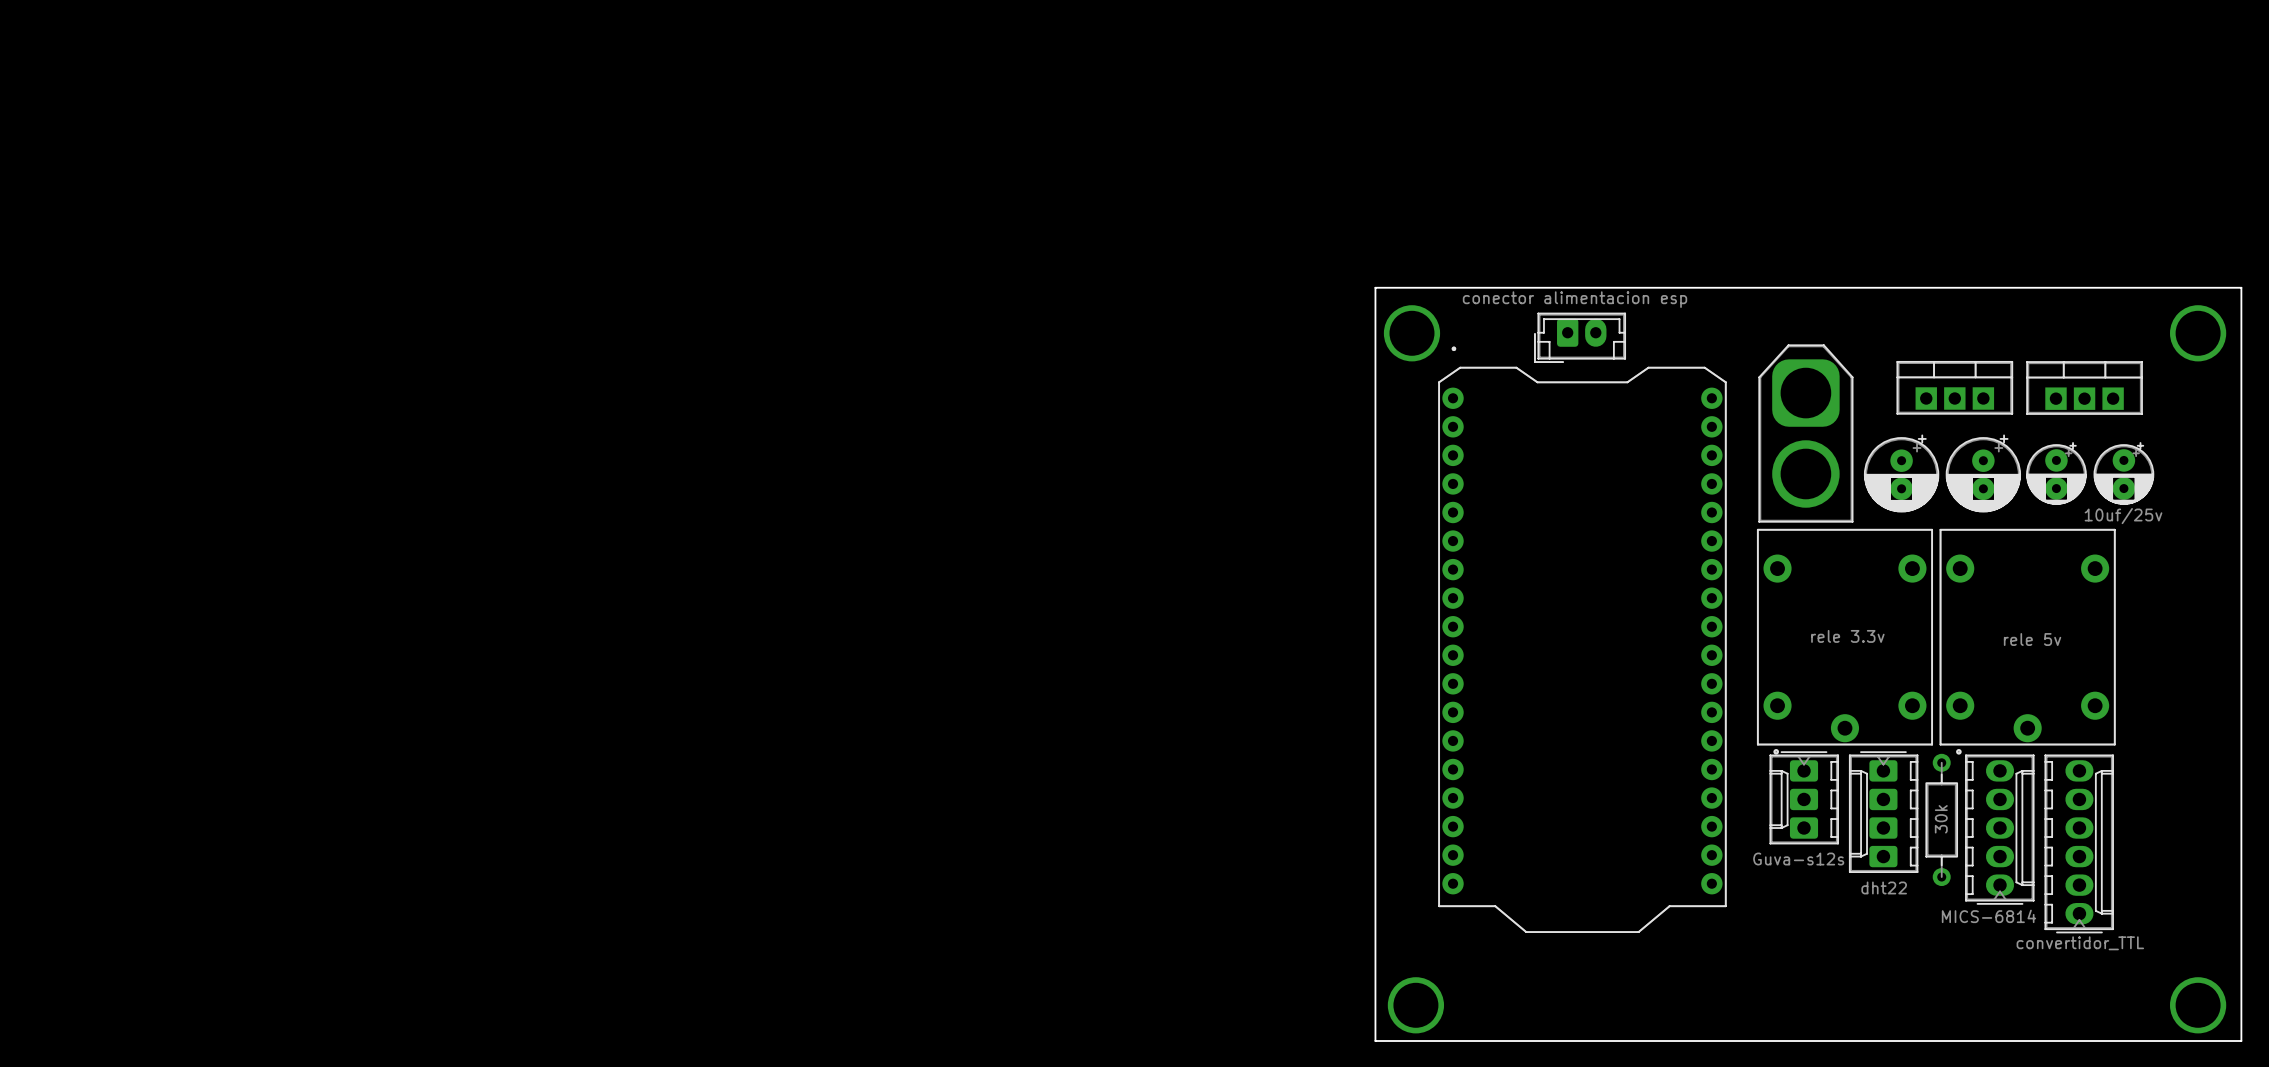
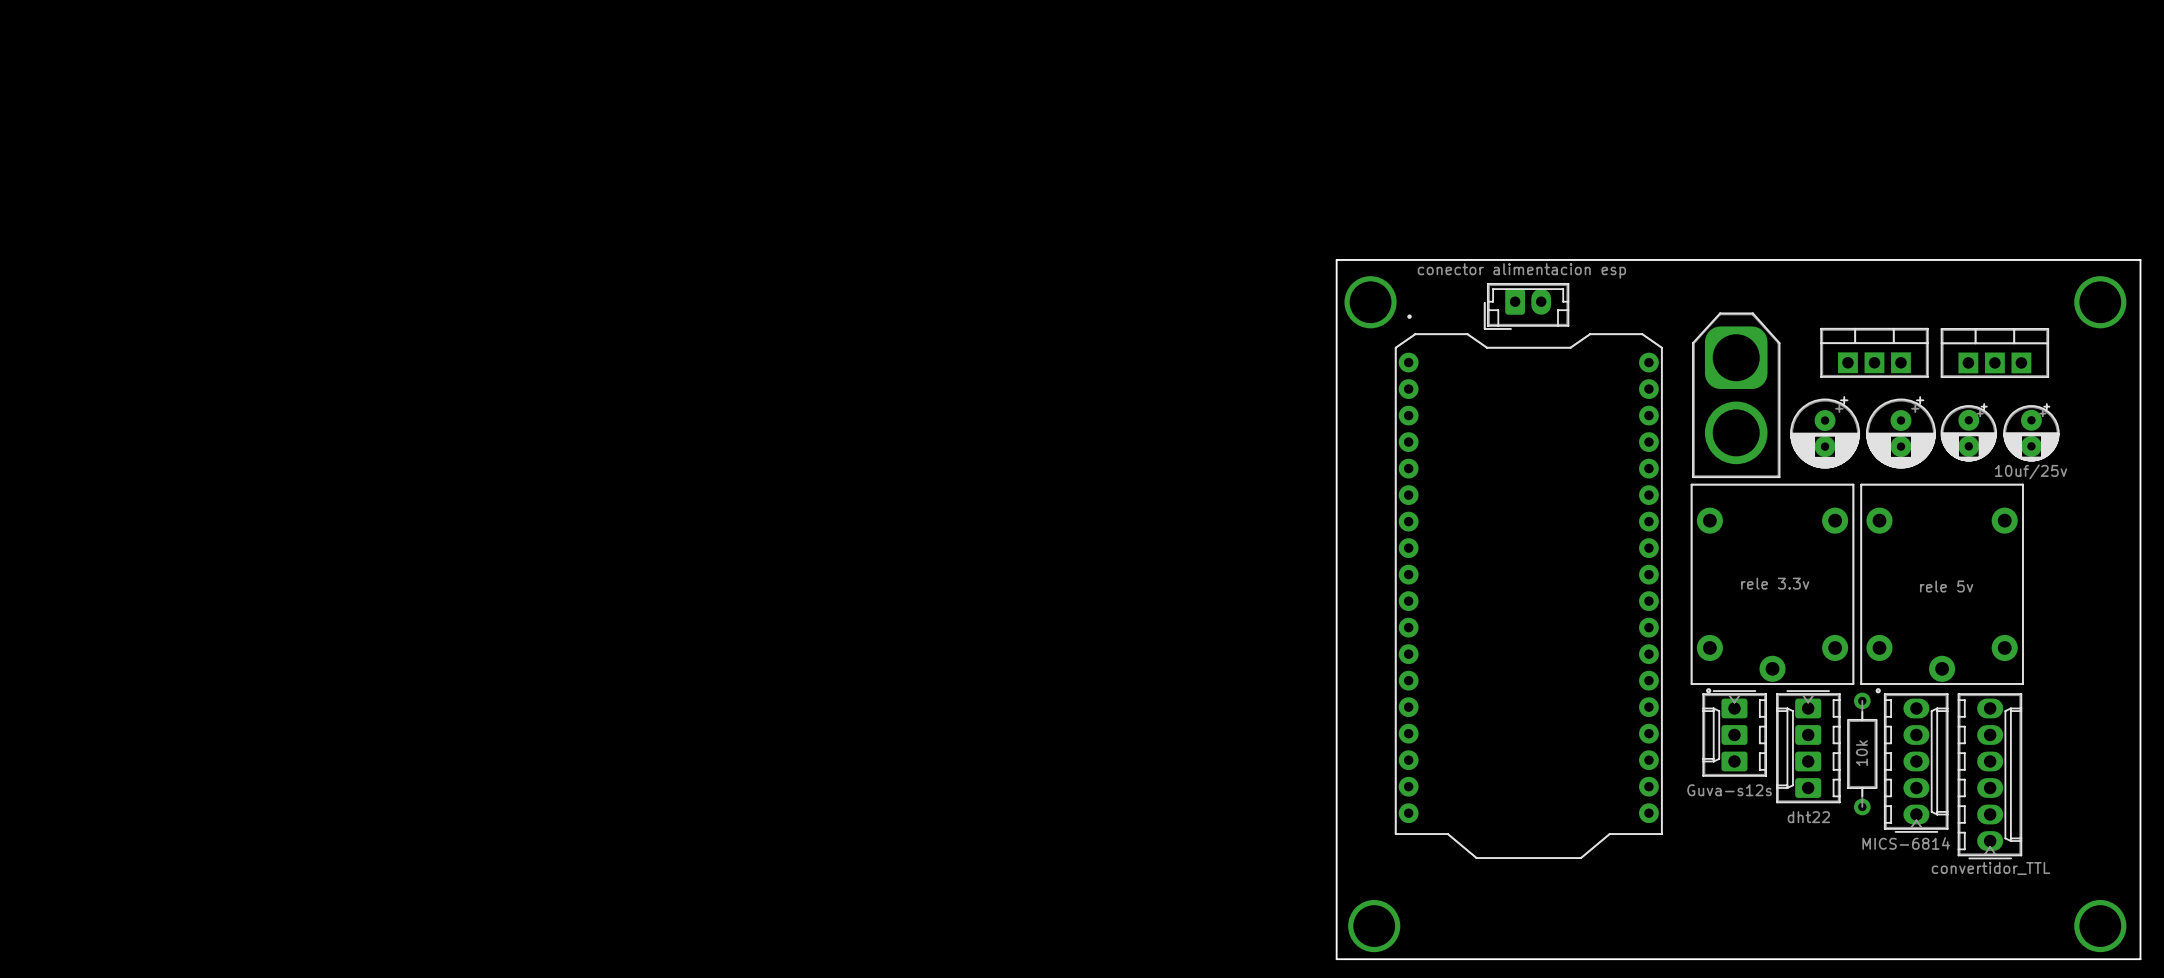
part value: 30k (1941, 819) -> 10k (1861, 753)

